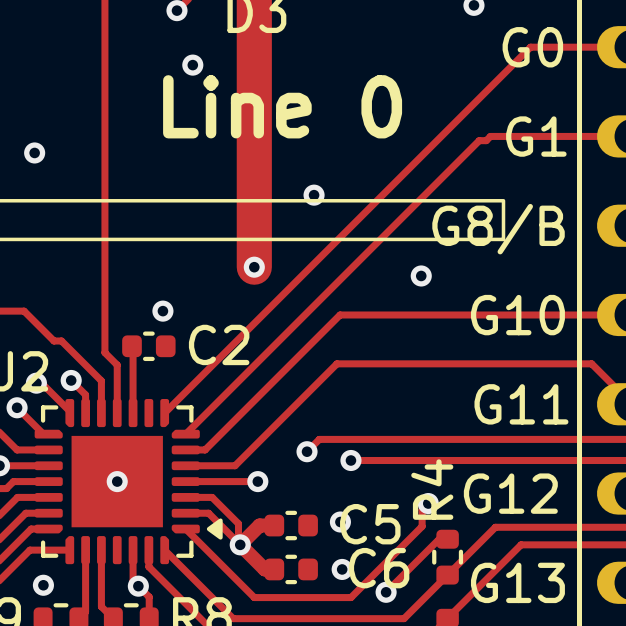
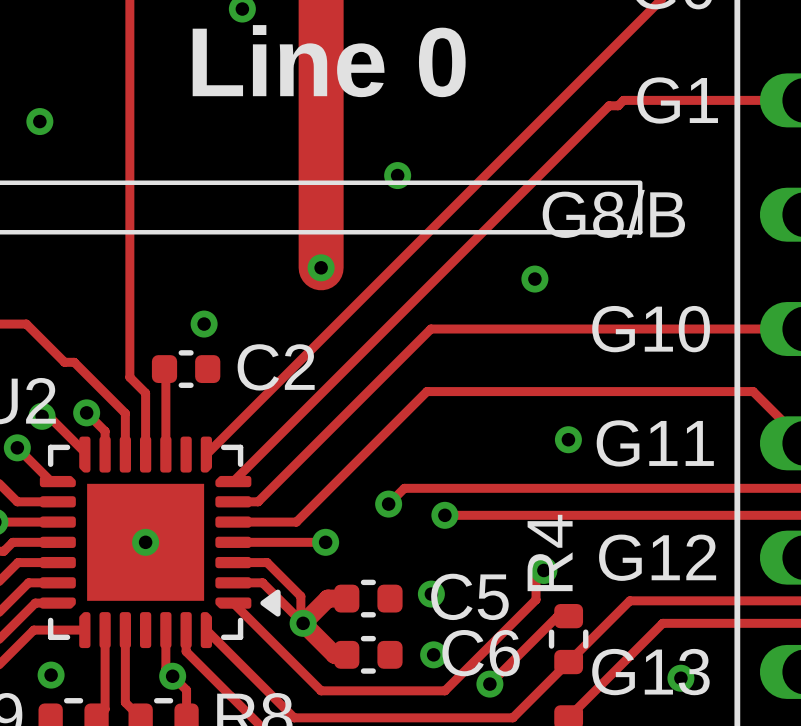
via: none -> (568, 439)
via: none -> (680, 678)

